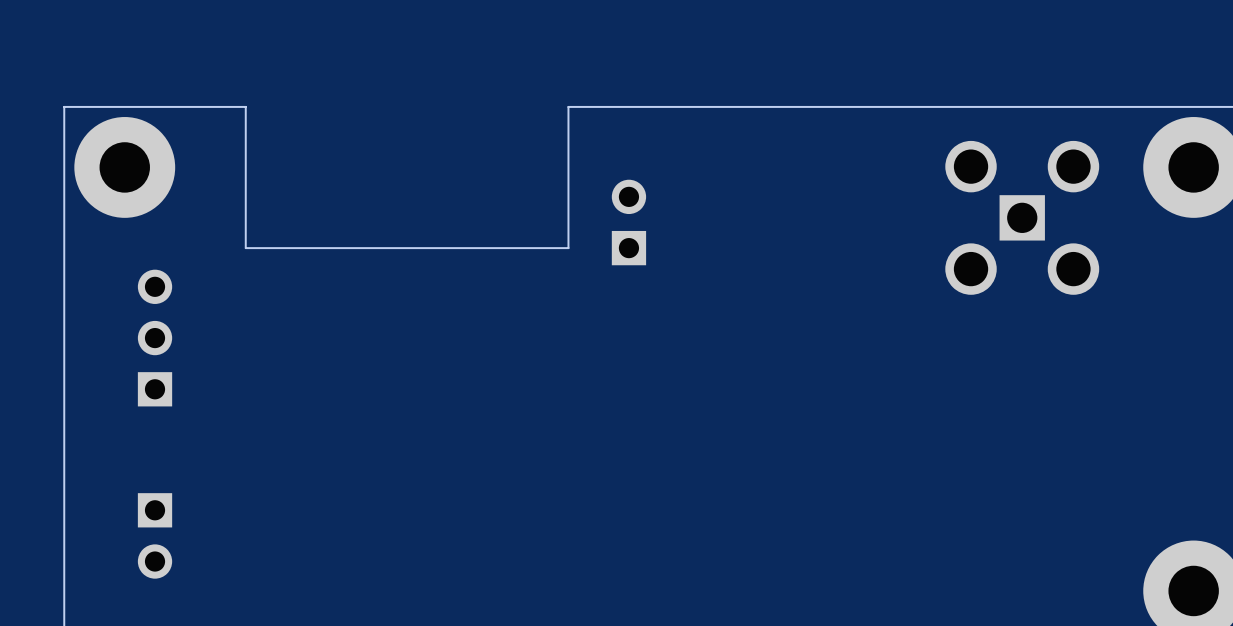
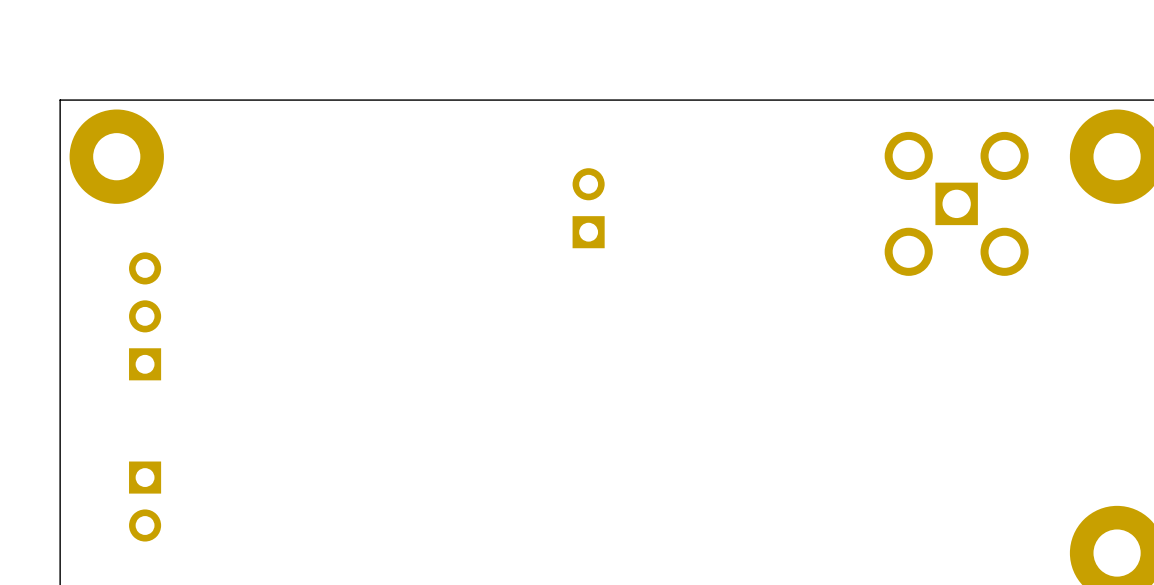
board edge: (568, 106) (568, 248) (245, 248) (245, 106) -> (531, 100) (230, 100)

